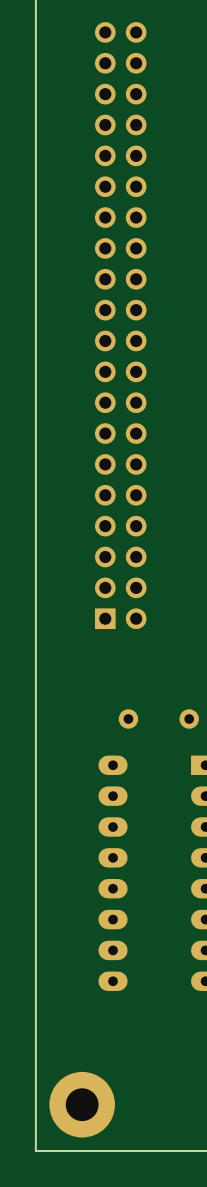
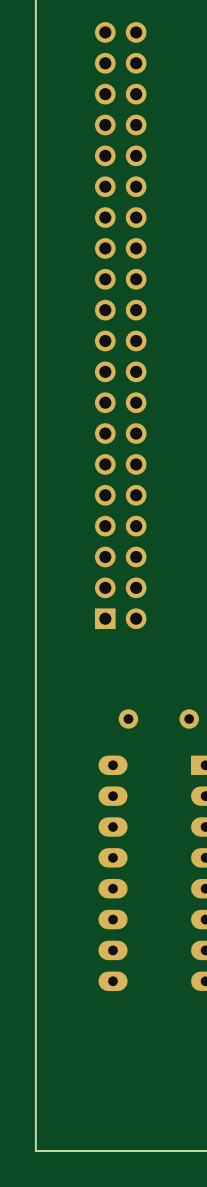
part: (82, 1104) -> none

